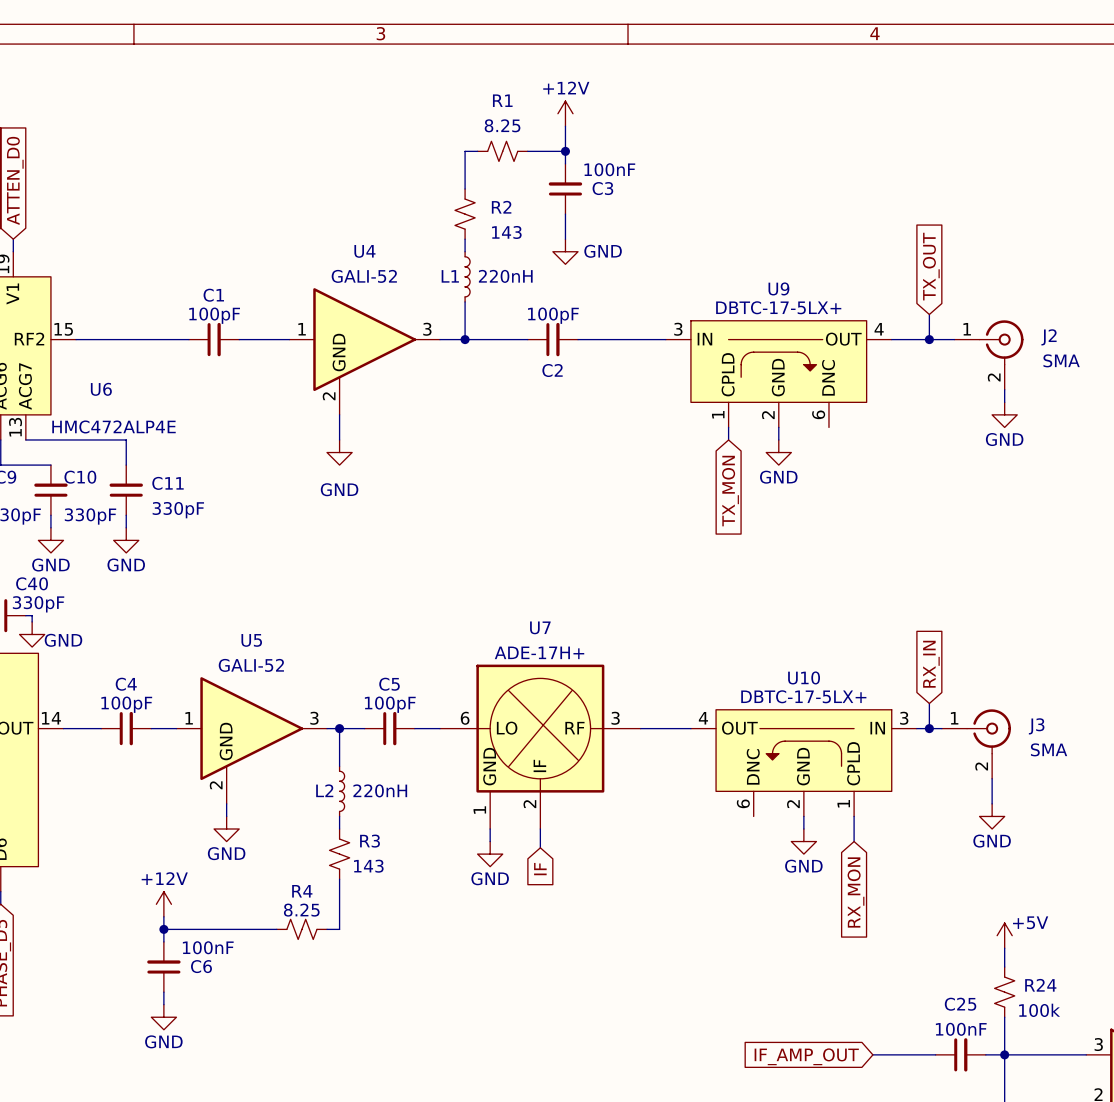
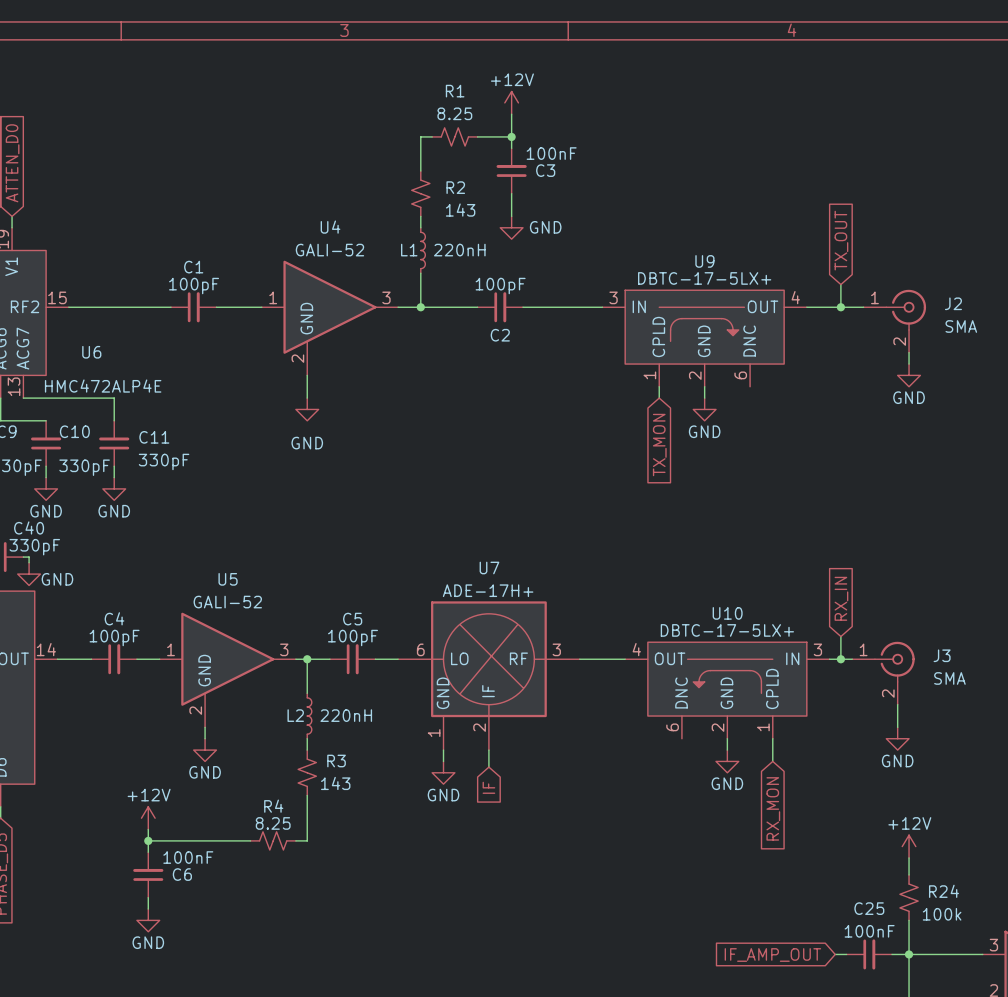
power symbol: +5V (1004, 935) -> +12V (909, 846)
wire: (872, 1054) (923, 1054) -> none
global label position: IF_AMP_OUT (806, 1056) -> IF_AMP_OUT (772, 955)

